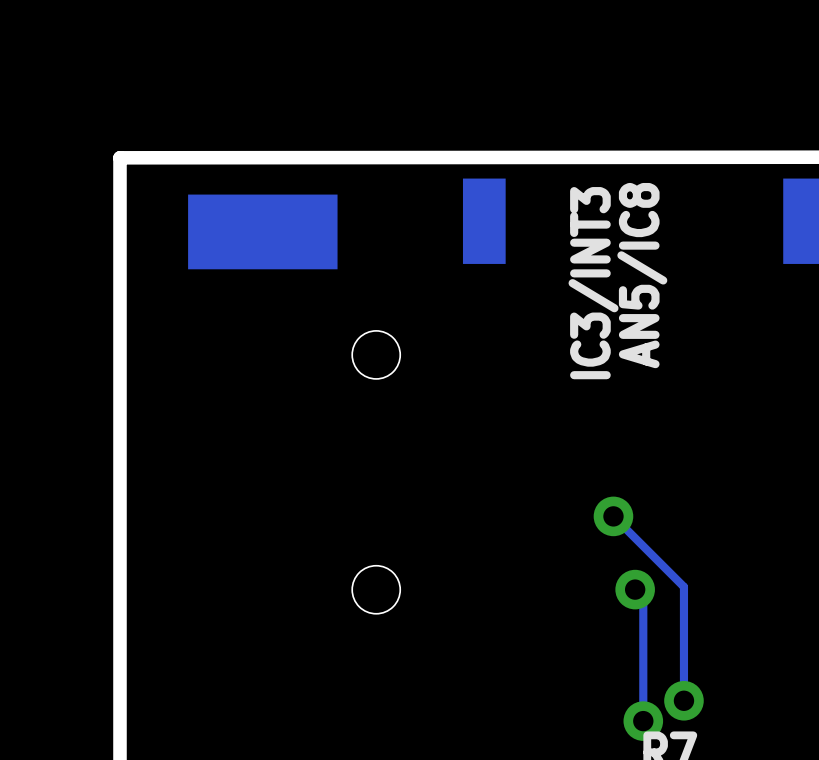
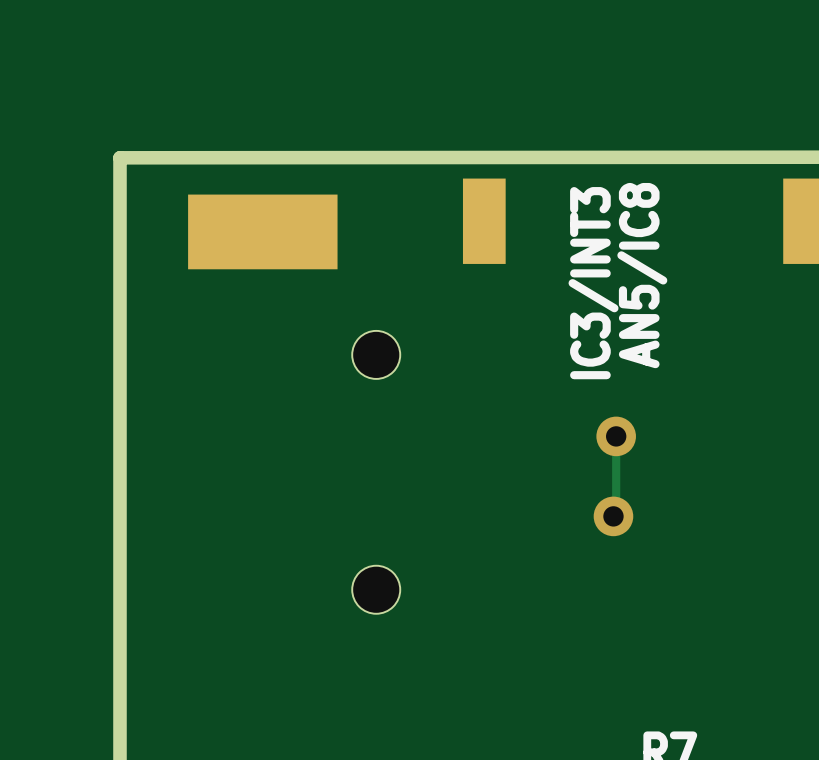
via: none -> (616, 436)
track: (613, 516) (683, 586) (683, 700) -> (613, 516) (616, 513) (616, 436)
track: (635, 589) (643, 597) (643, 721) -> none
via: (635, 589) -> none
via: (683, 700) -> none
via: (643, 721) -> none

